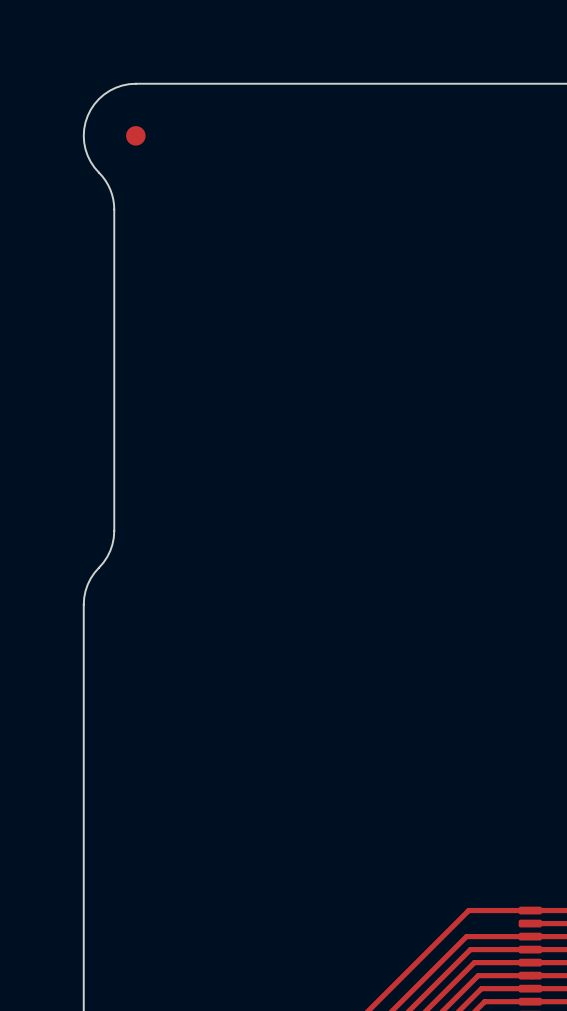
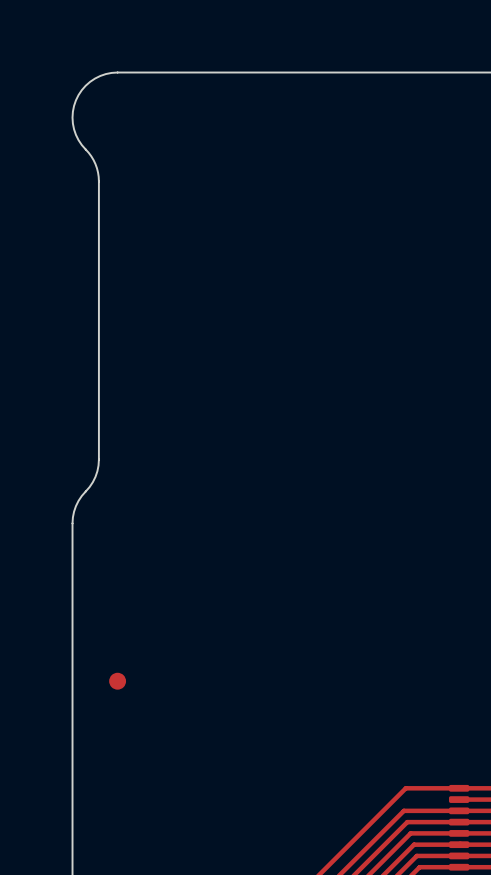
part position: (135, 135) -> (117, 681)

